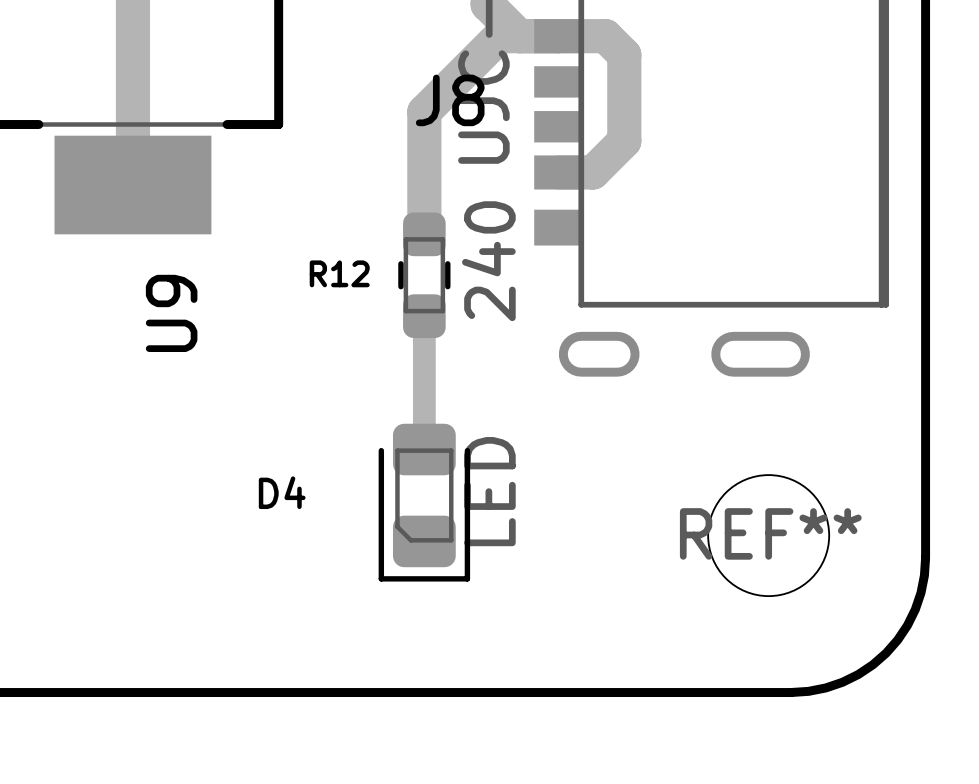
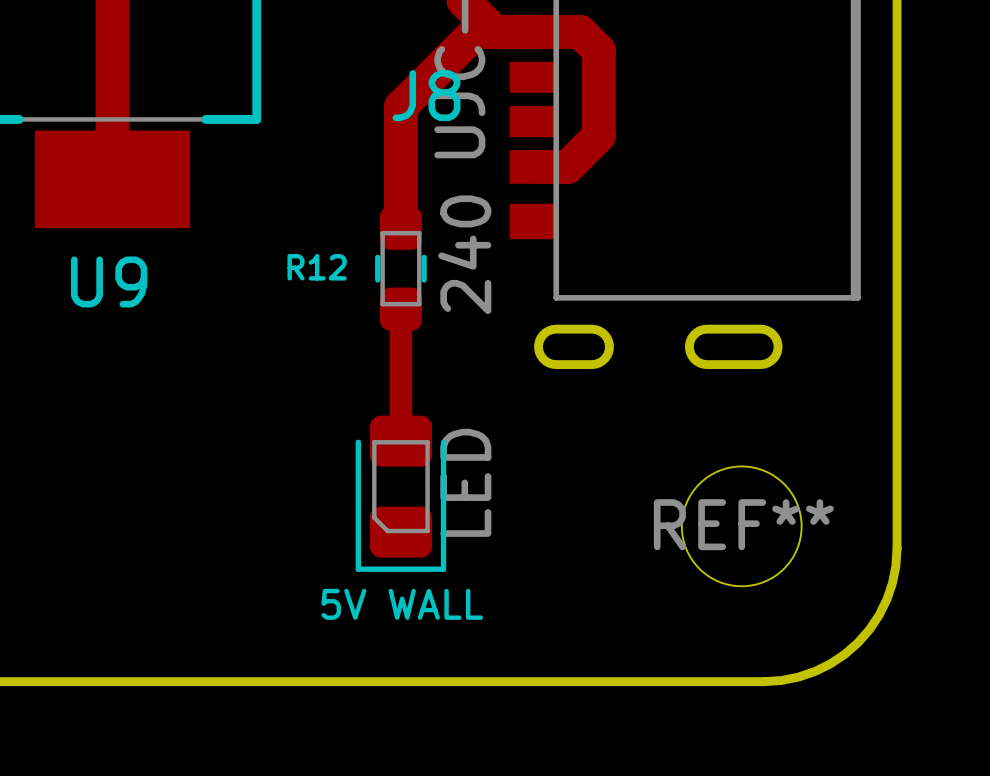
U9 name rotation: 0° (171, 313) -> 90° clockwise (109, 281)
D4 name: D4 (282, 492) -> 5V WALL (402, 604)

